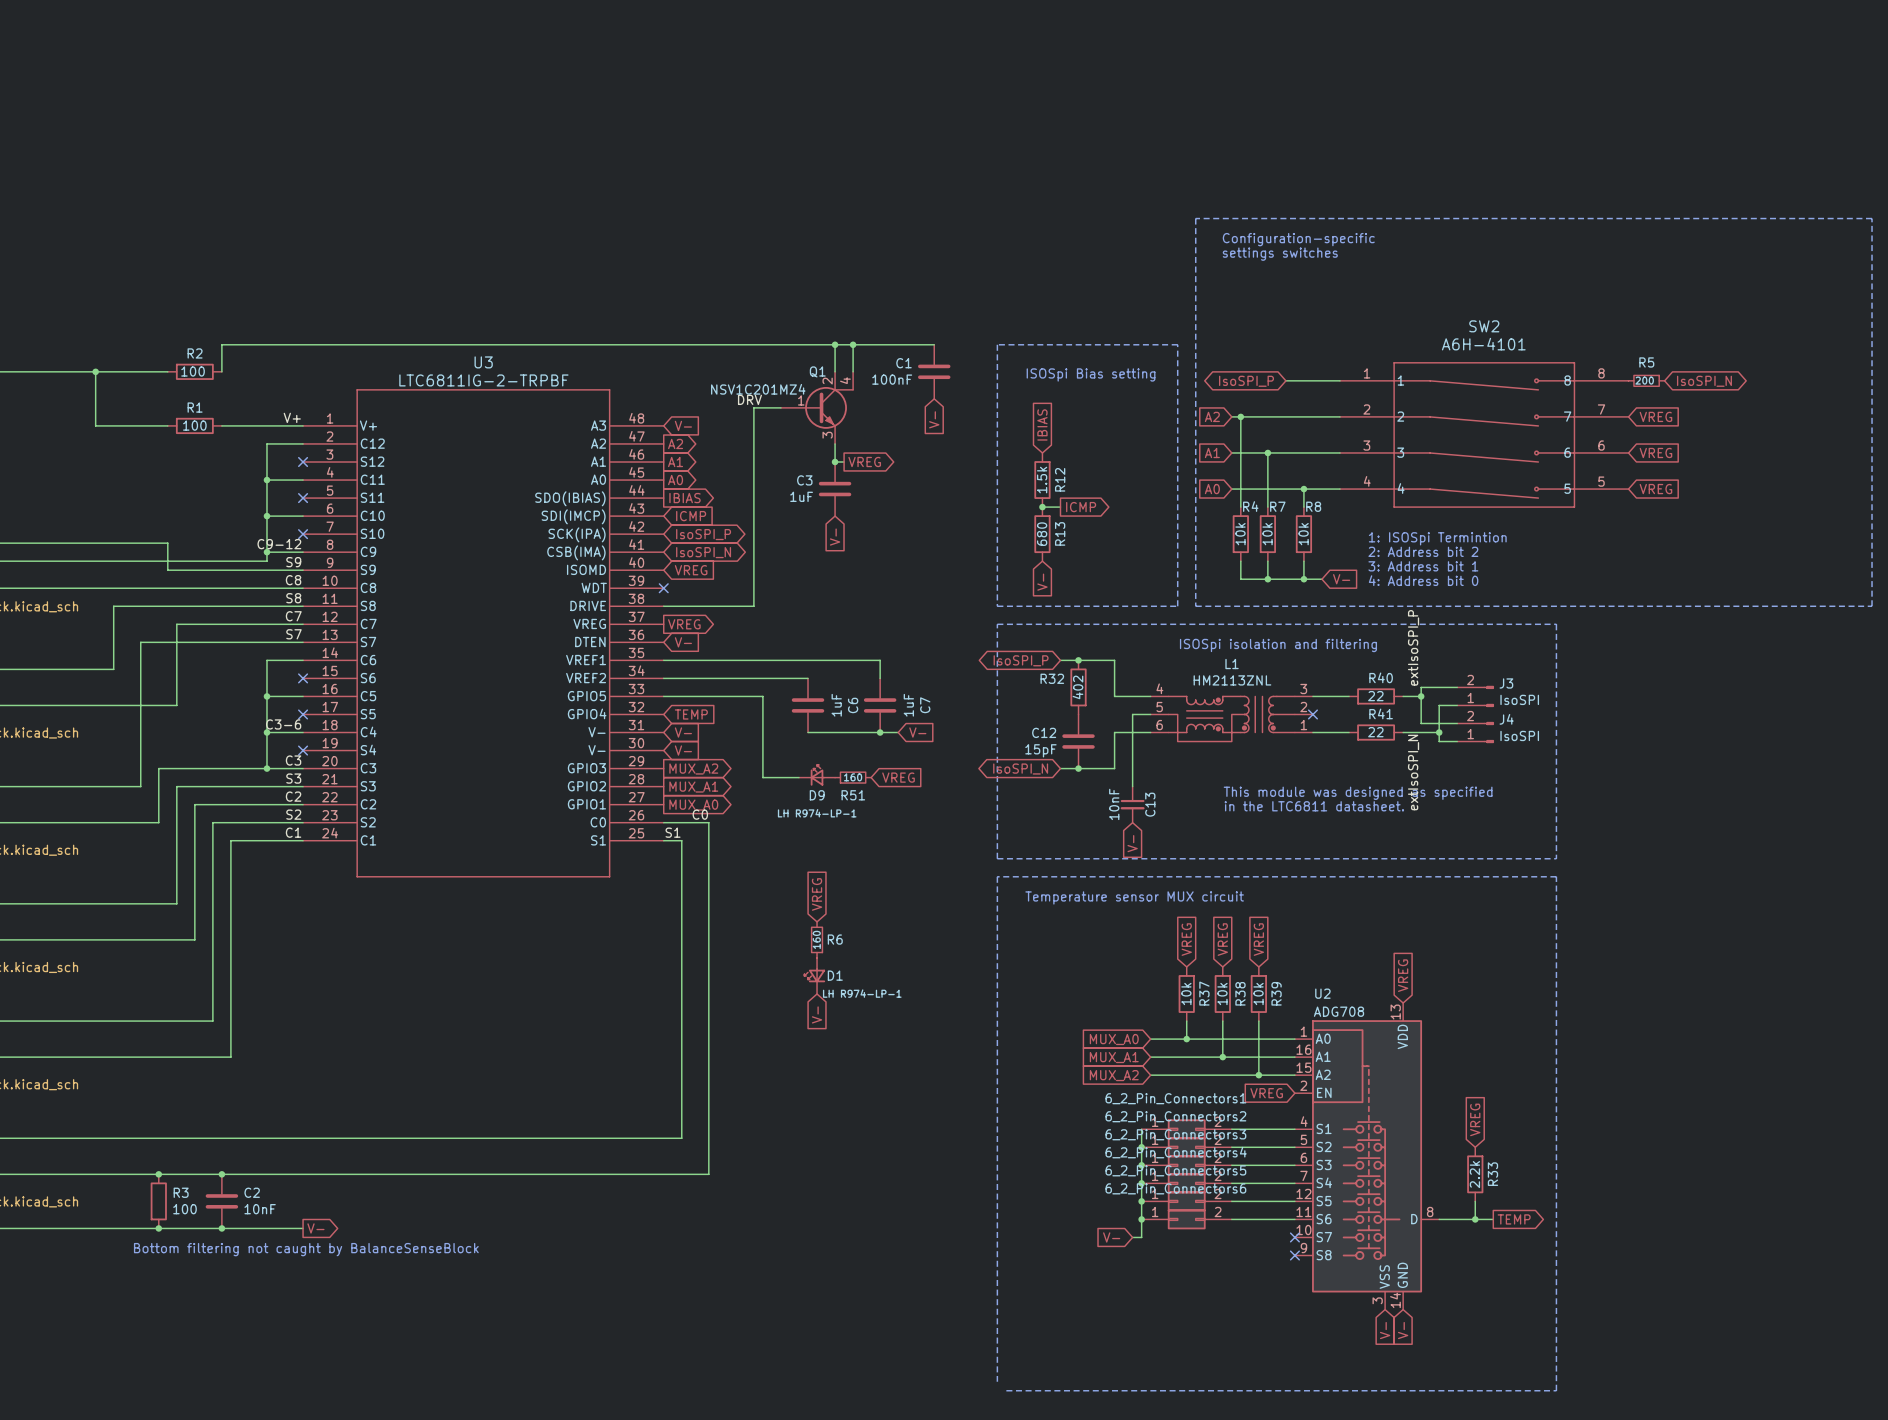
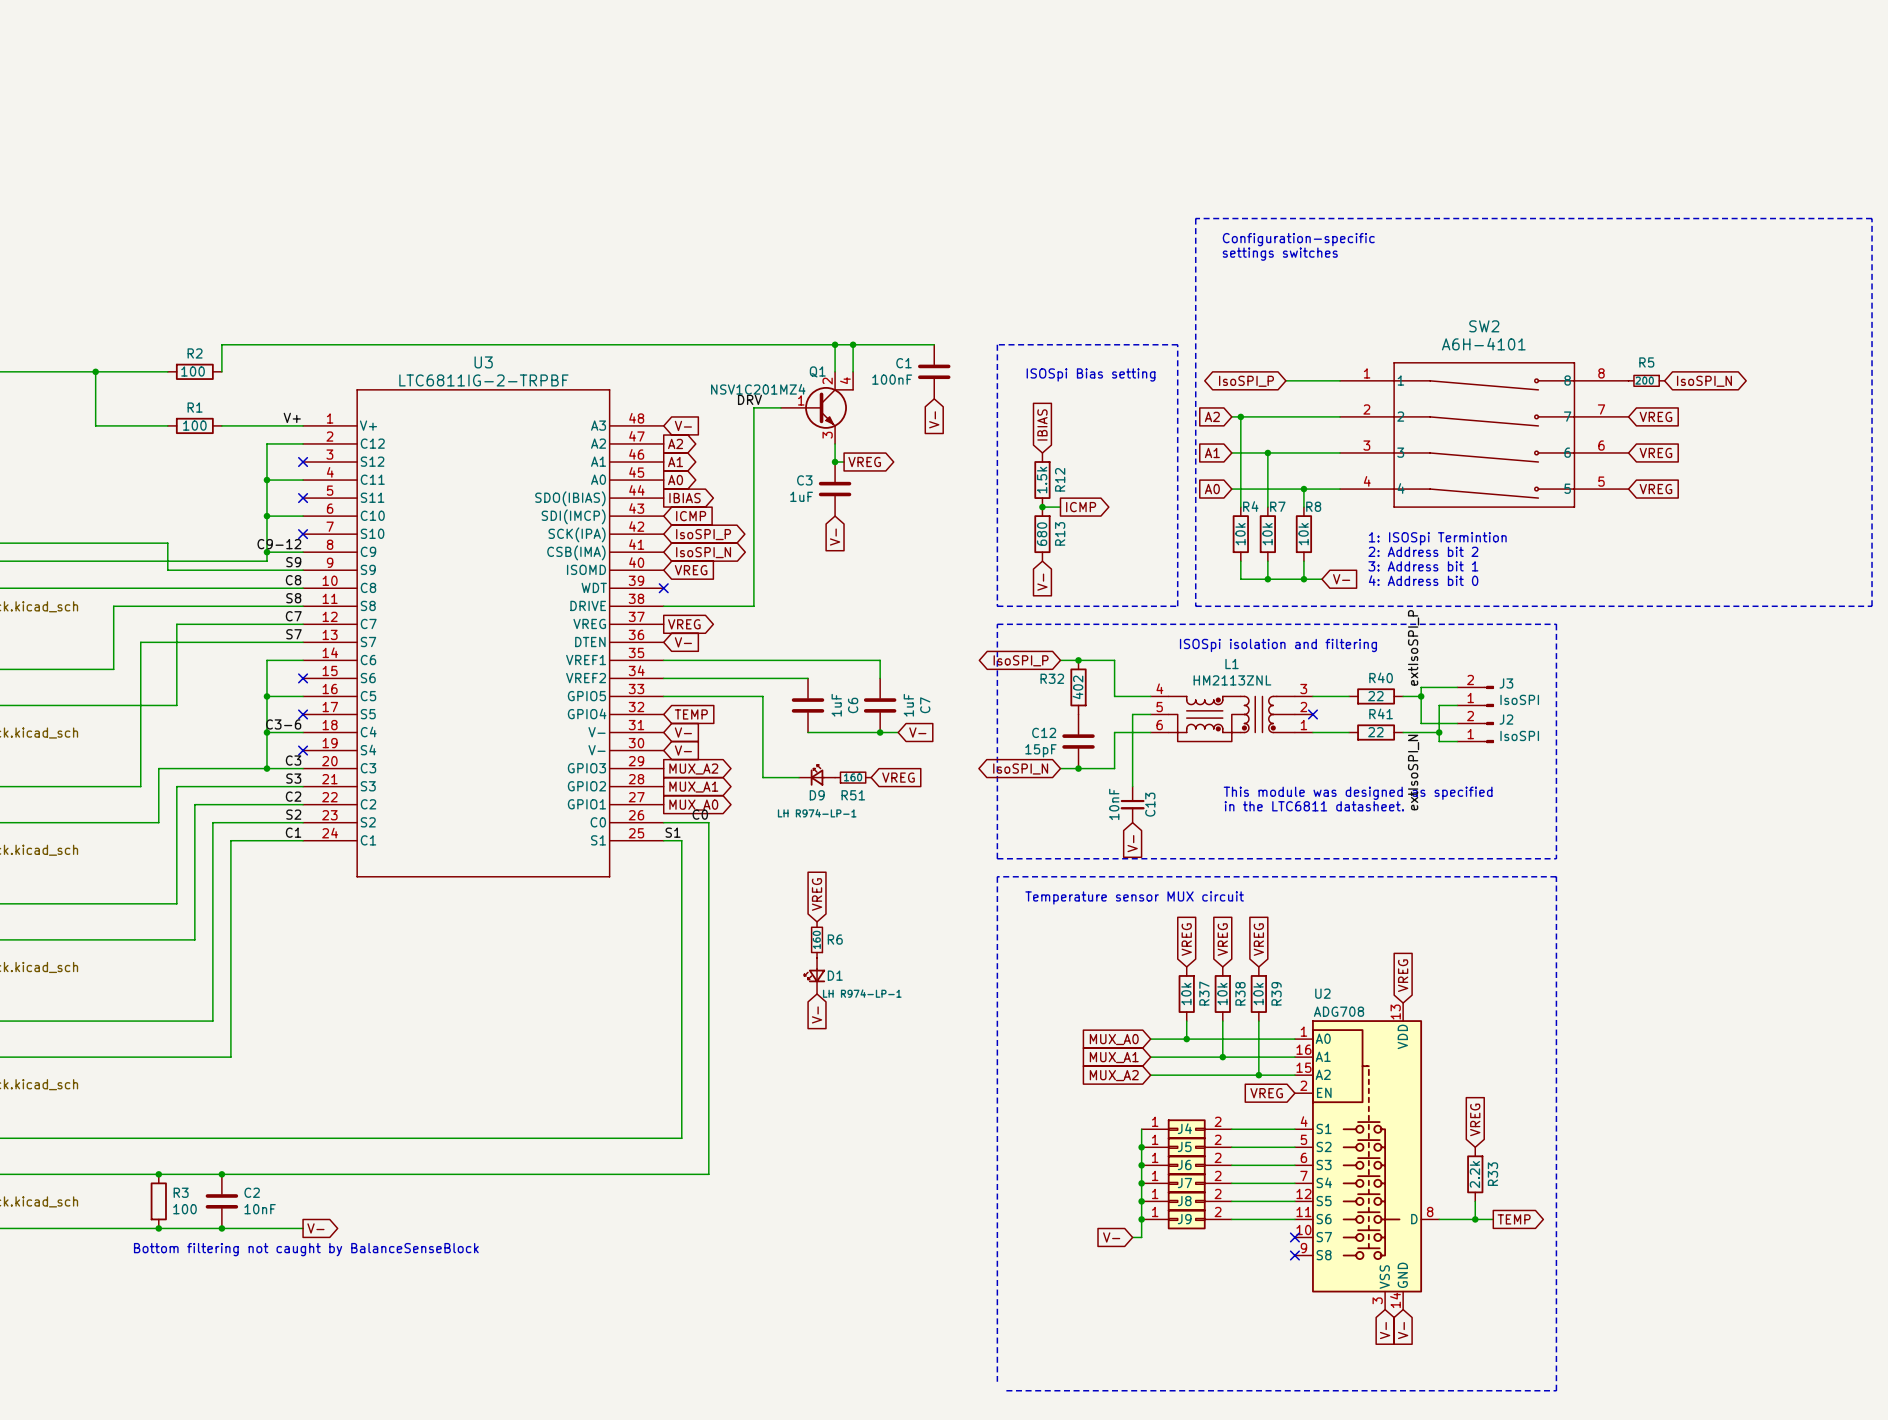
J4 name: J4 (1506, 719) -> J2 (1506, 719)
6_2_Pin_Connectors1 name: 6_2_Pin_Connectors1 (1175, 1098) -> J4 (1184, 1128)
6_2_Pin_Connectors2 name: 6_2_Pin_Connectors2 (1175, 1116) -> J5 (1184, 1146)
6_2_Pin_Connectors3 name: 6_2_Pin_Connectors3 (1175, 1134) -> J6 (1184, 1164)
6_2_Pin_Connectors4 name: 6_2_Pin_Connectors4 (1176, 1152) -> J7 (1184, 1183)
6_2_Pin_Connectors5 name: 6_2_Pin_Connectors5 (1175, 1170) -> J8 (1184, 1201)
6_2_Pin_Connectors6 name: 6_2_Pin_Connectors6 (1175, 1188) -> J9 (1184, 1219)

